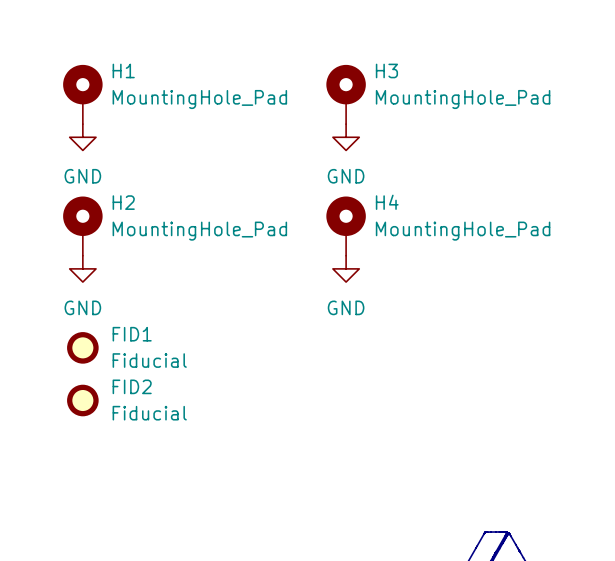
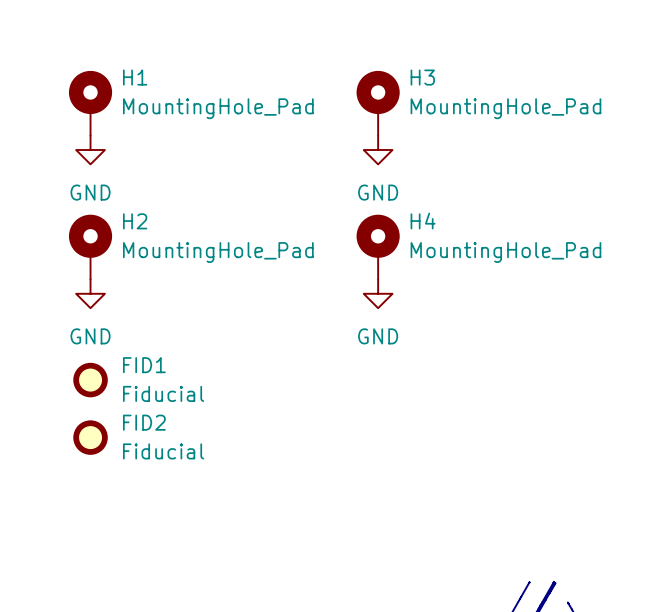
line: (506, 532) (485, 532) -> none
line: (509, 533) (519, 551) -> none

